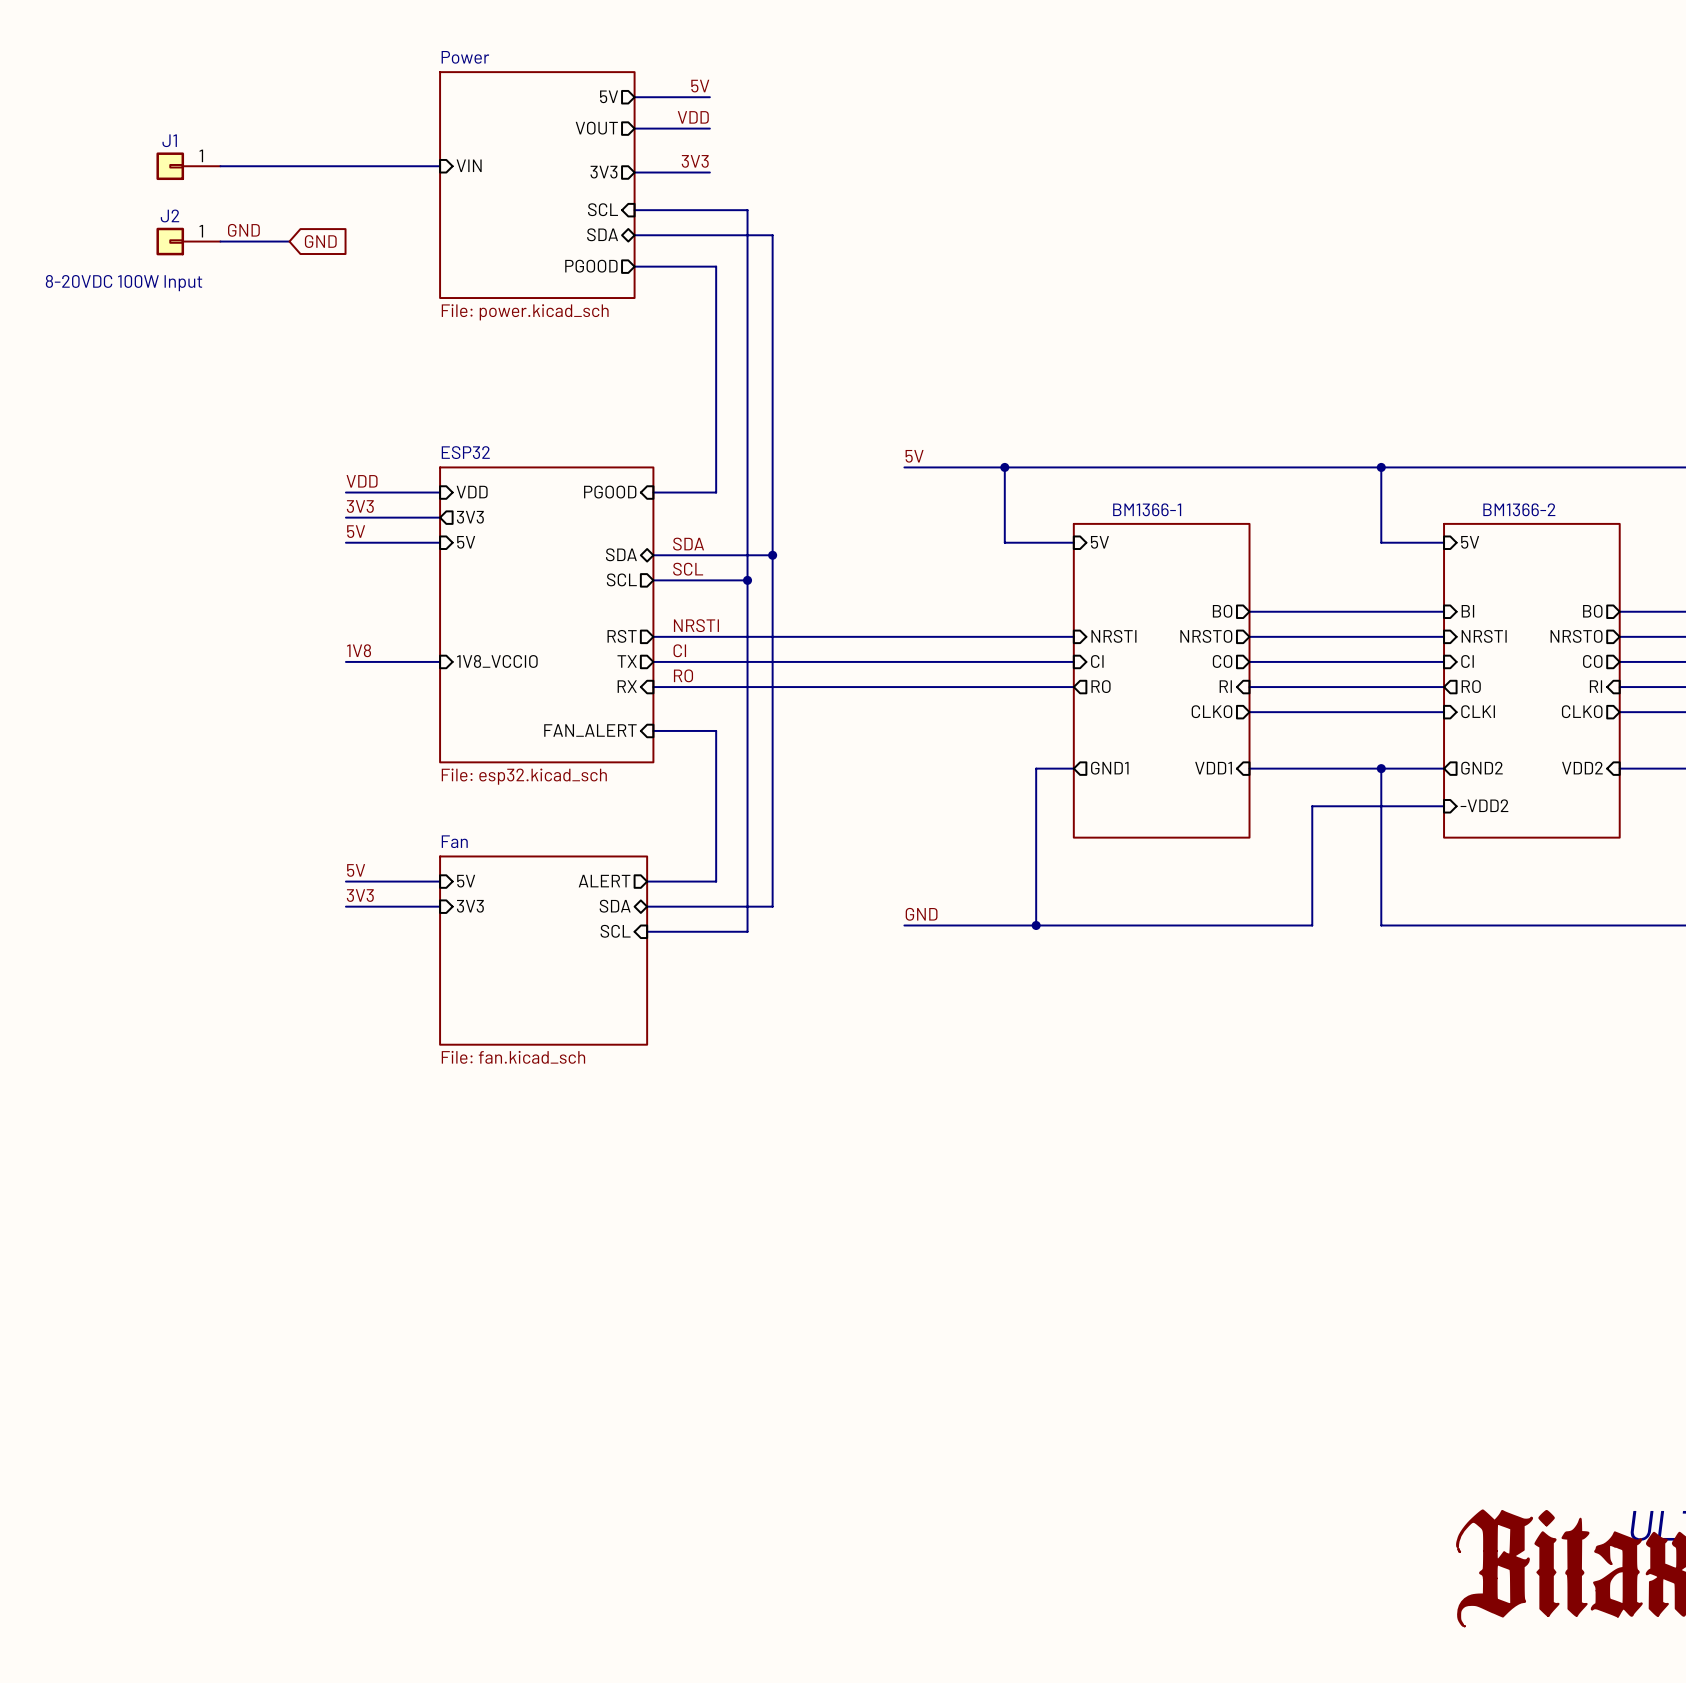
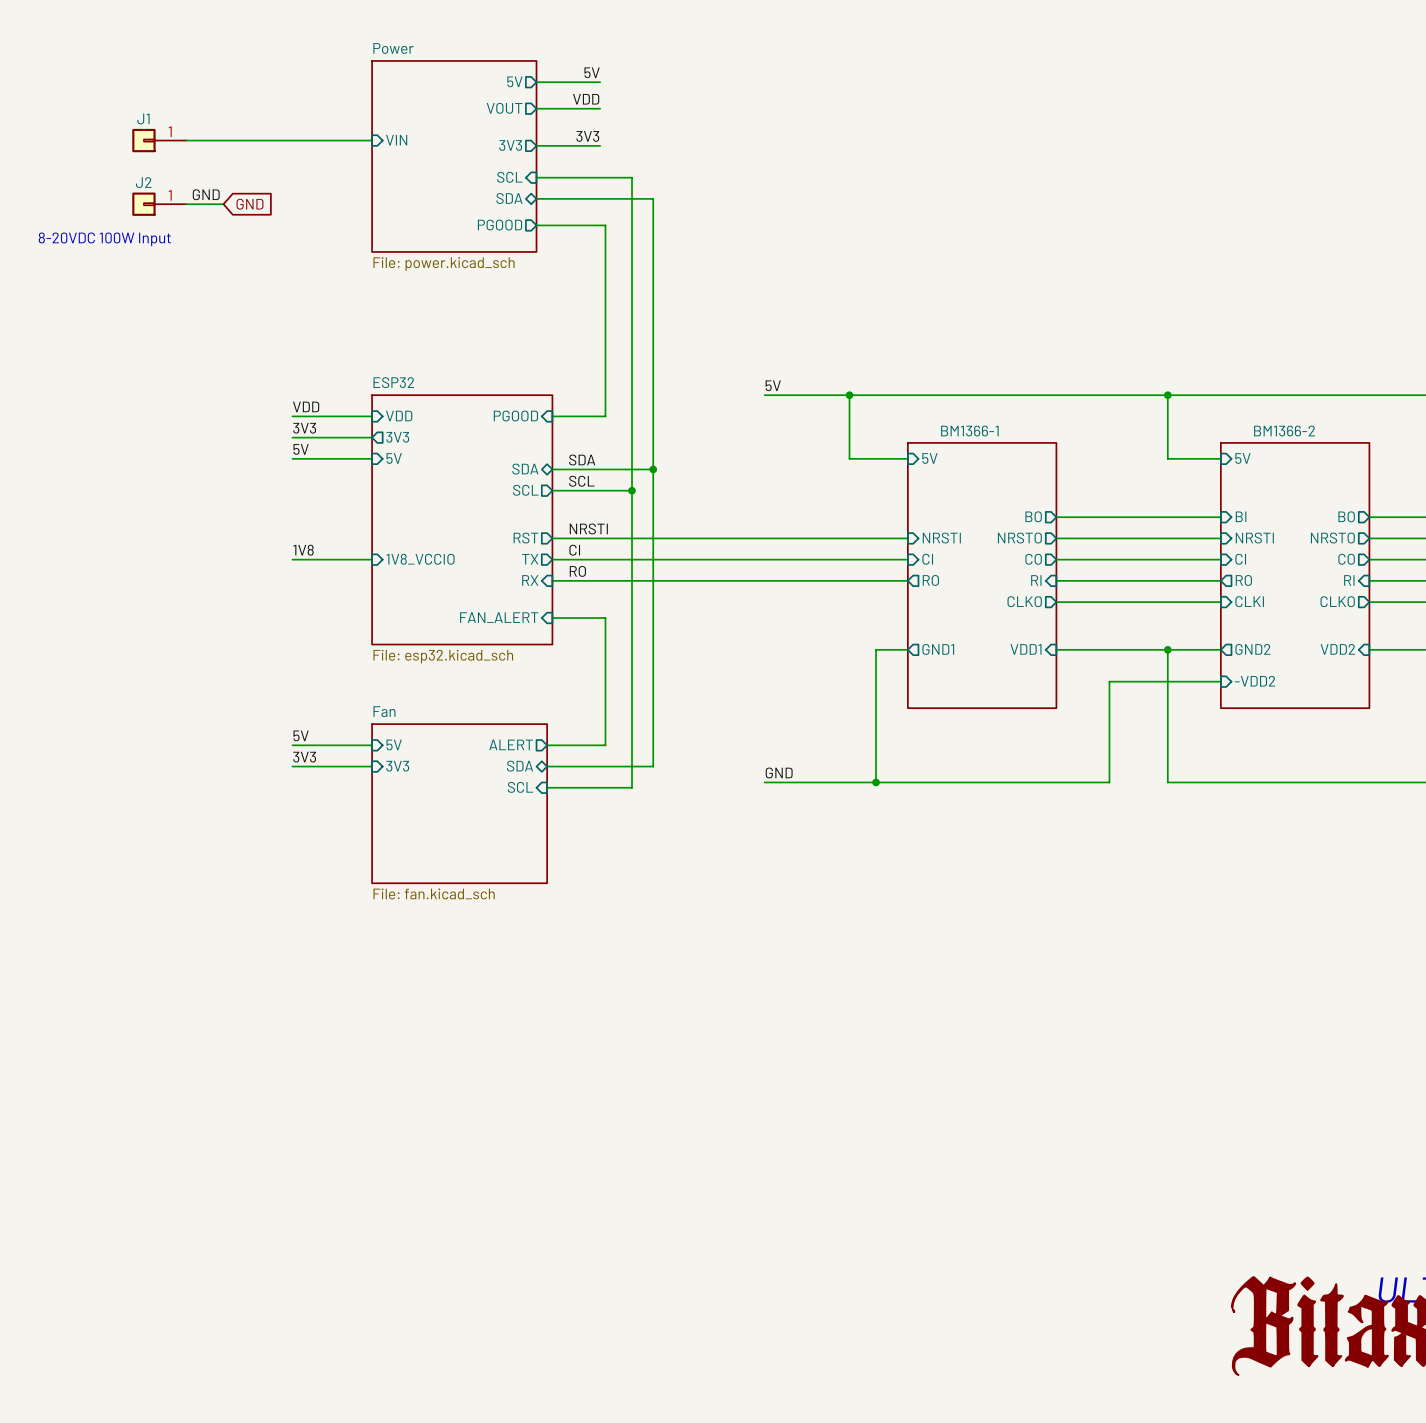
wire: (264, 241) (289, 241) -> none
global label position: GND (320, 241) -> GND (249, 204)

